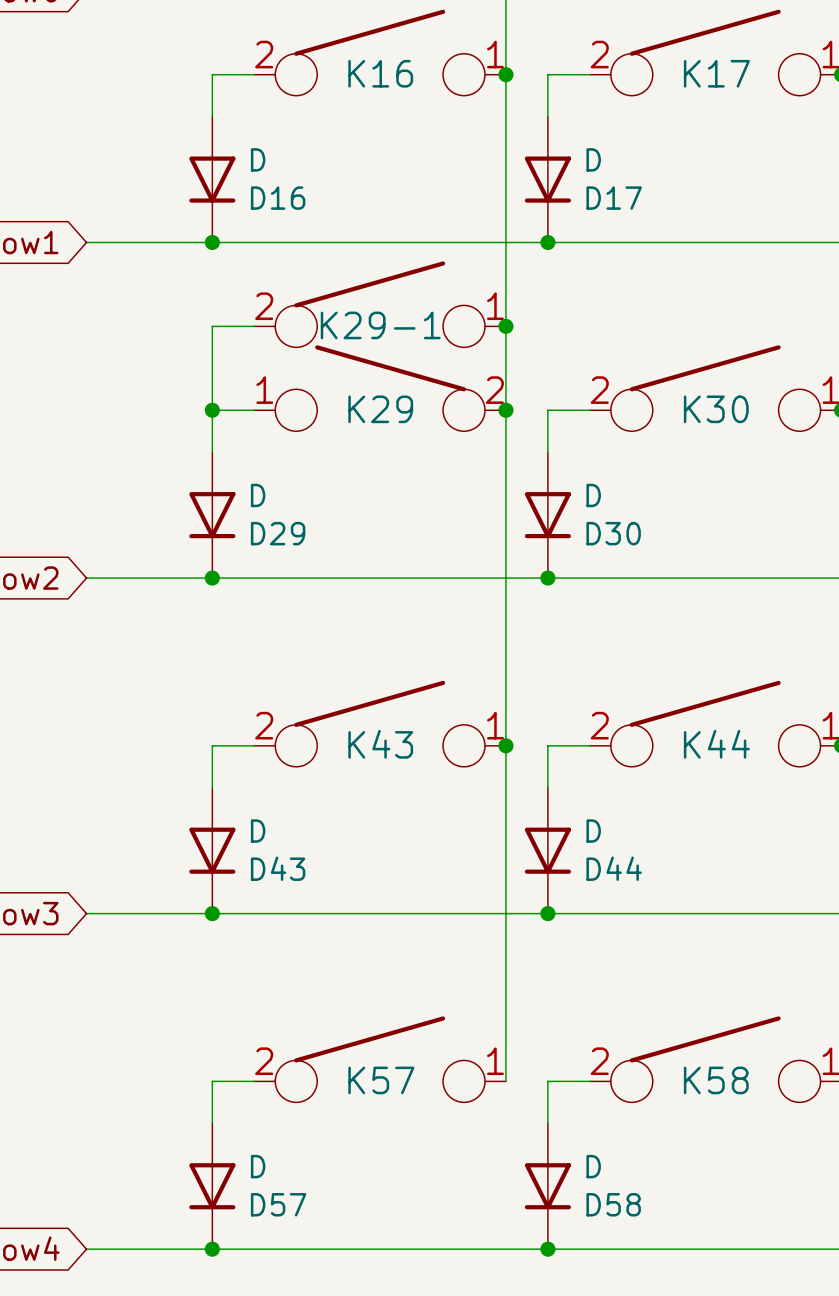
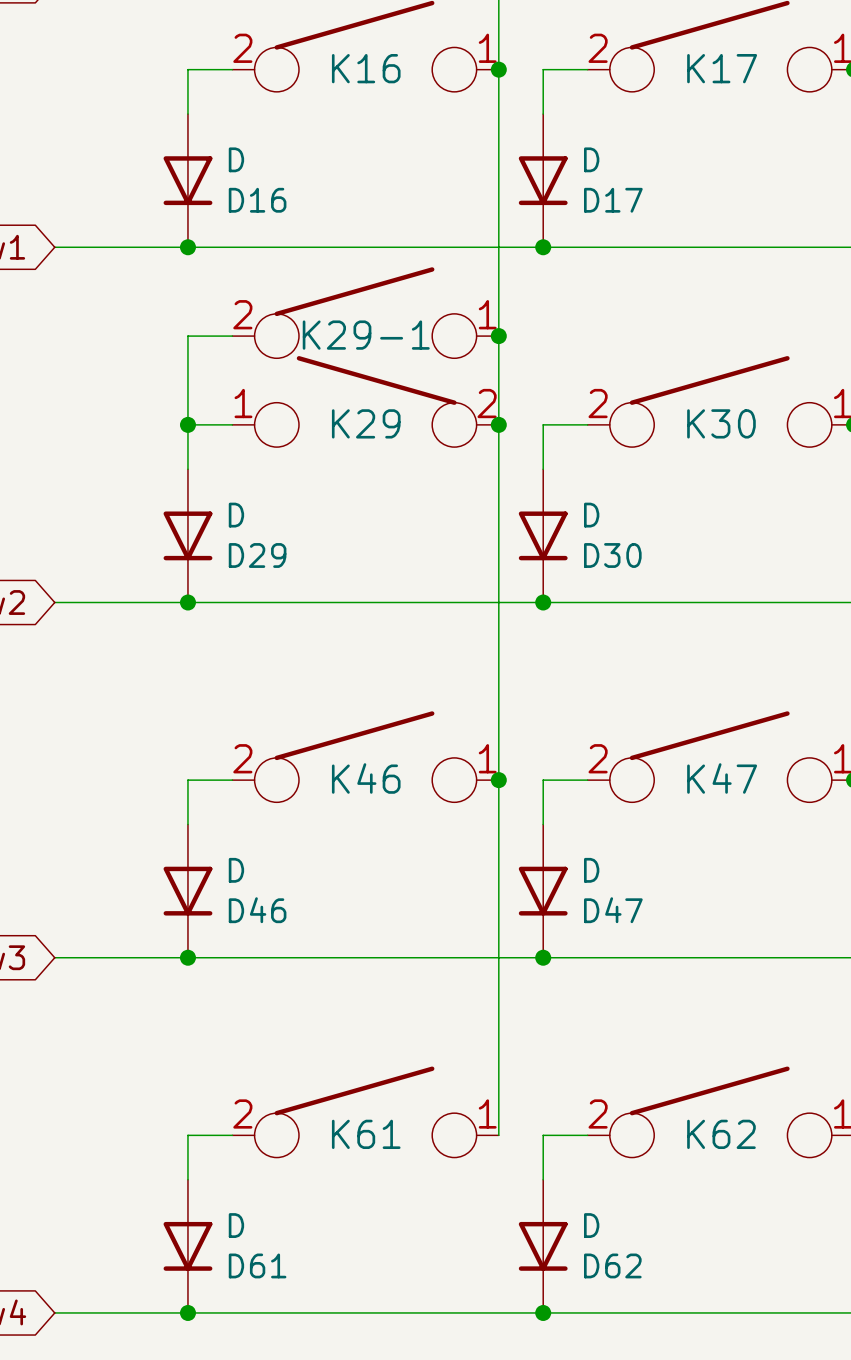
K43 name: K43 (380, 744) -> K46 (366, 778)
K44 name: K44 (716, 744) -> K47 (722, 778)
D43 name: D43 (278, 868) -> D46 (257, 910)
D44 name: D44 (614, 868) -> D47 (613, 910)
K57 name: K57 (381, 1080) -> K61 (366, 1134)
K58 name: K58 (716, 1080) -> K62 (721, 1134)
D57 name: D57 (278, 1204) -> D61 (257, 1265)
D58 name: D58 (613, 1204) -> D62 (612, 1265)

